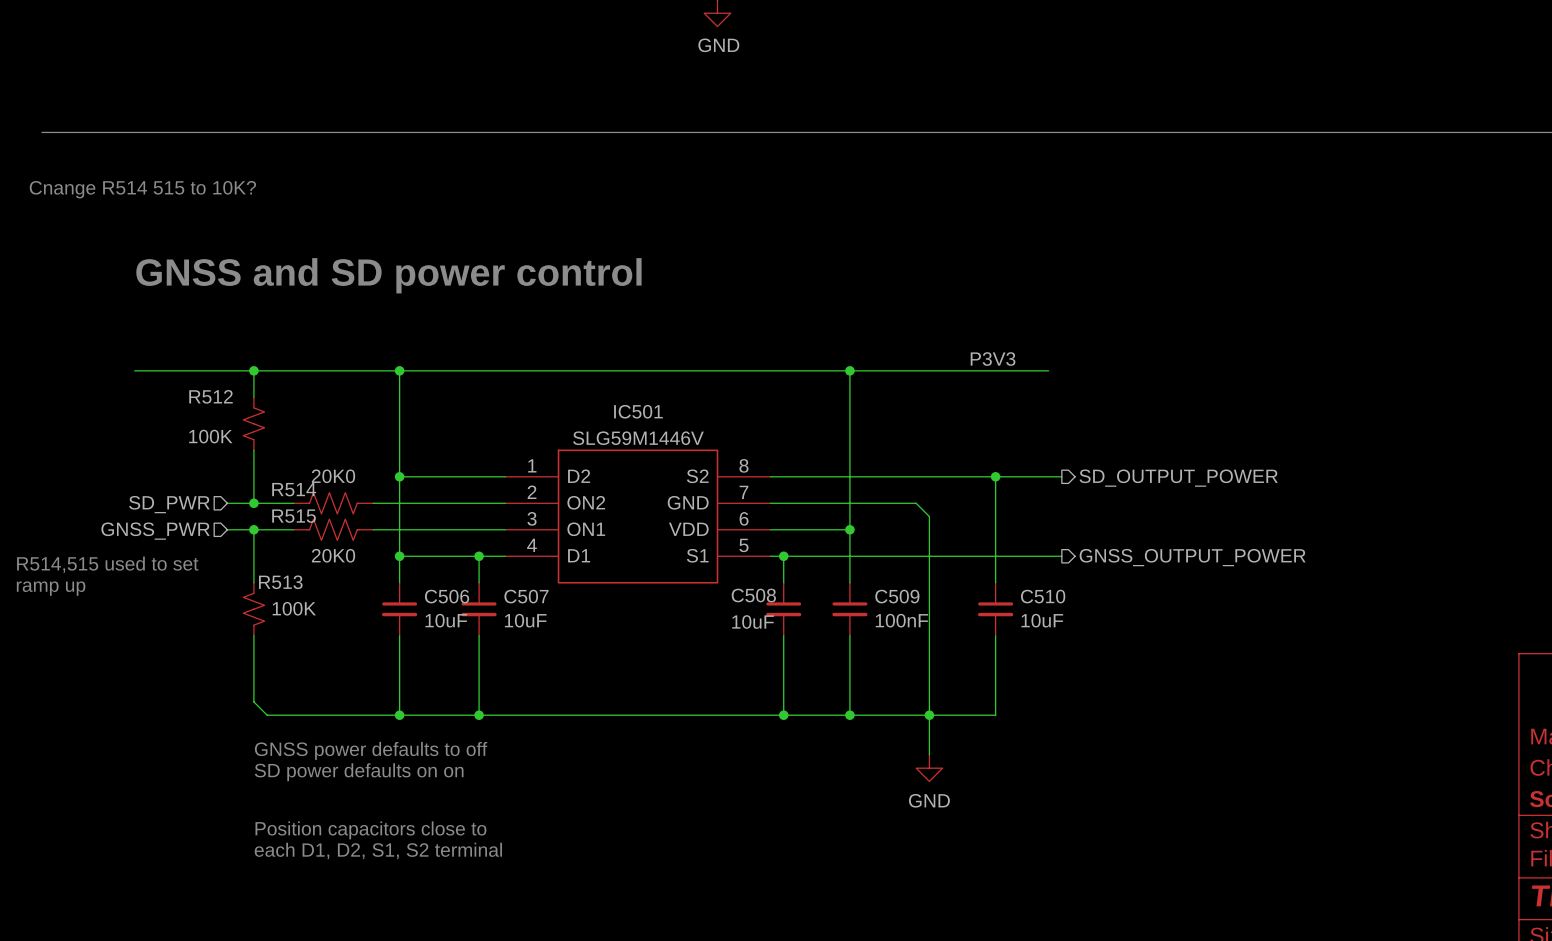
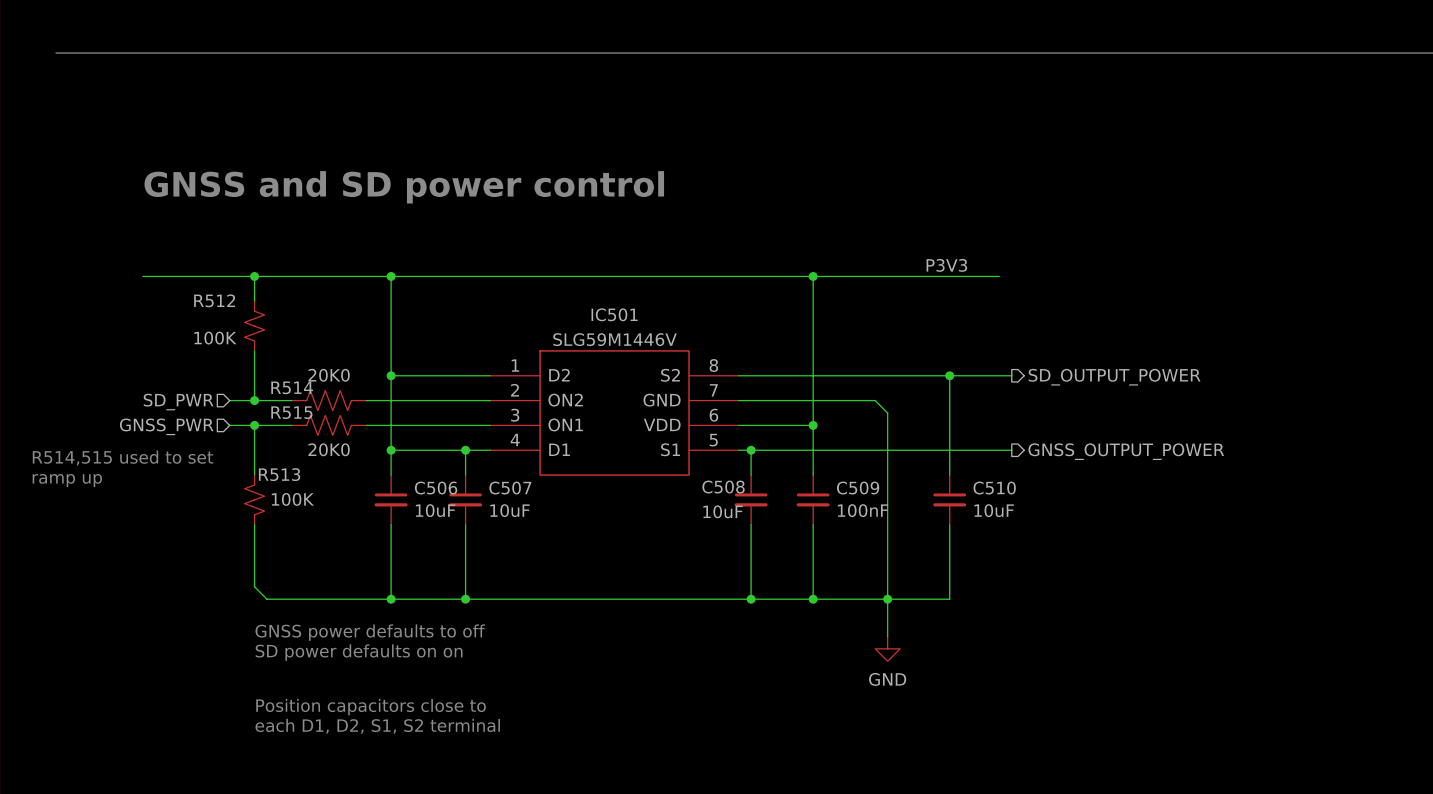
text: Cnange R514 515 to 10K? (142, 189) -> none

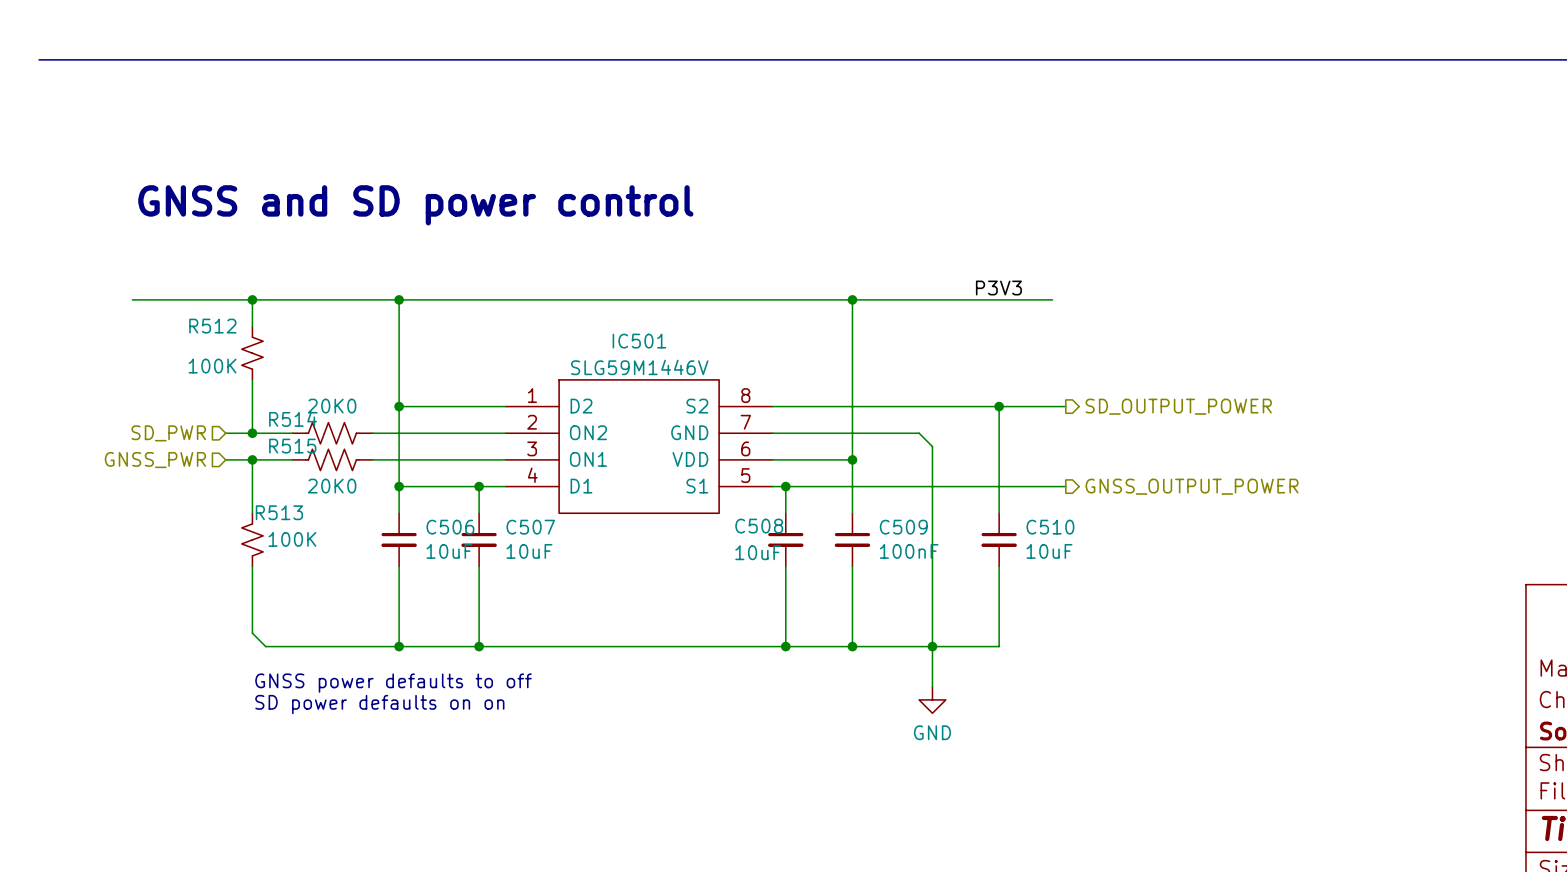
text: R514,515 used to set (123, 458) -> none
text: ramp up (67, 480) -> none
text: Position capacitors close to (371, 707) -> none
text: each D1, D2, S1, S2 terminal (377, 726) -> none

